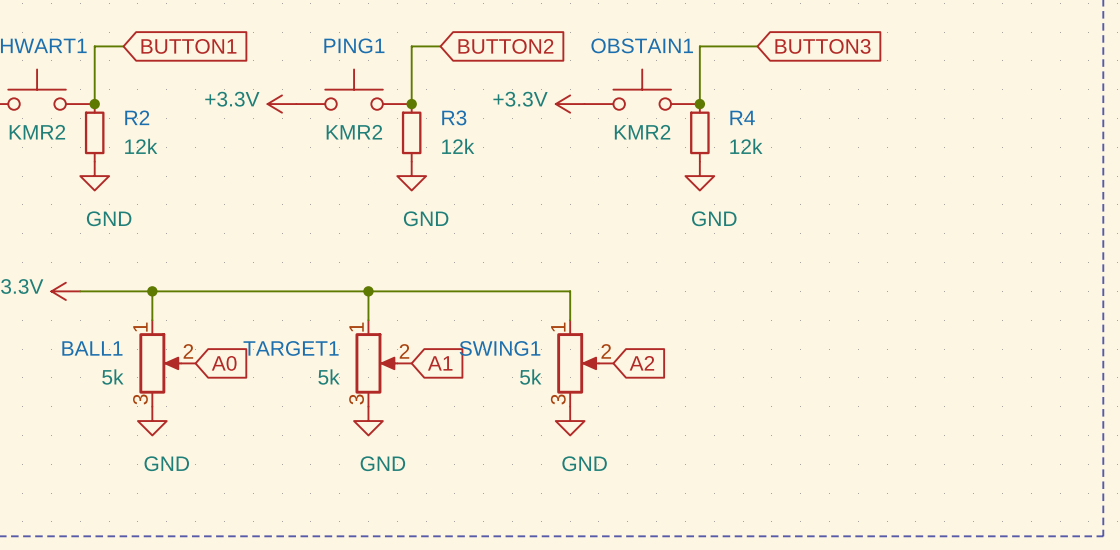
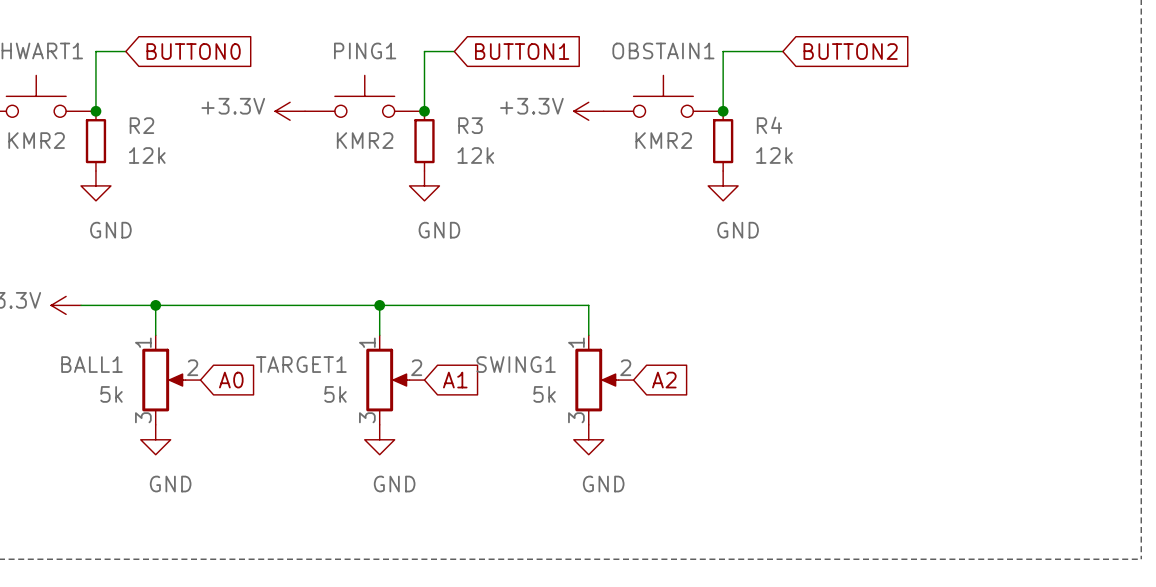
global label: BUTTON1 (188, 46) -> BUTTON0 (193, 51)
global label: BUTTON2 (505, 46) -> BUTTON1 (522, 51)
global label: BUTTON3 (822, 46) -> BUTTON2 (850, 51)

